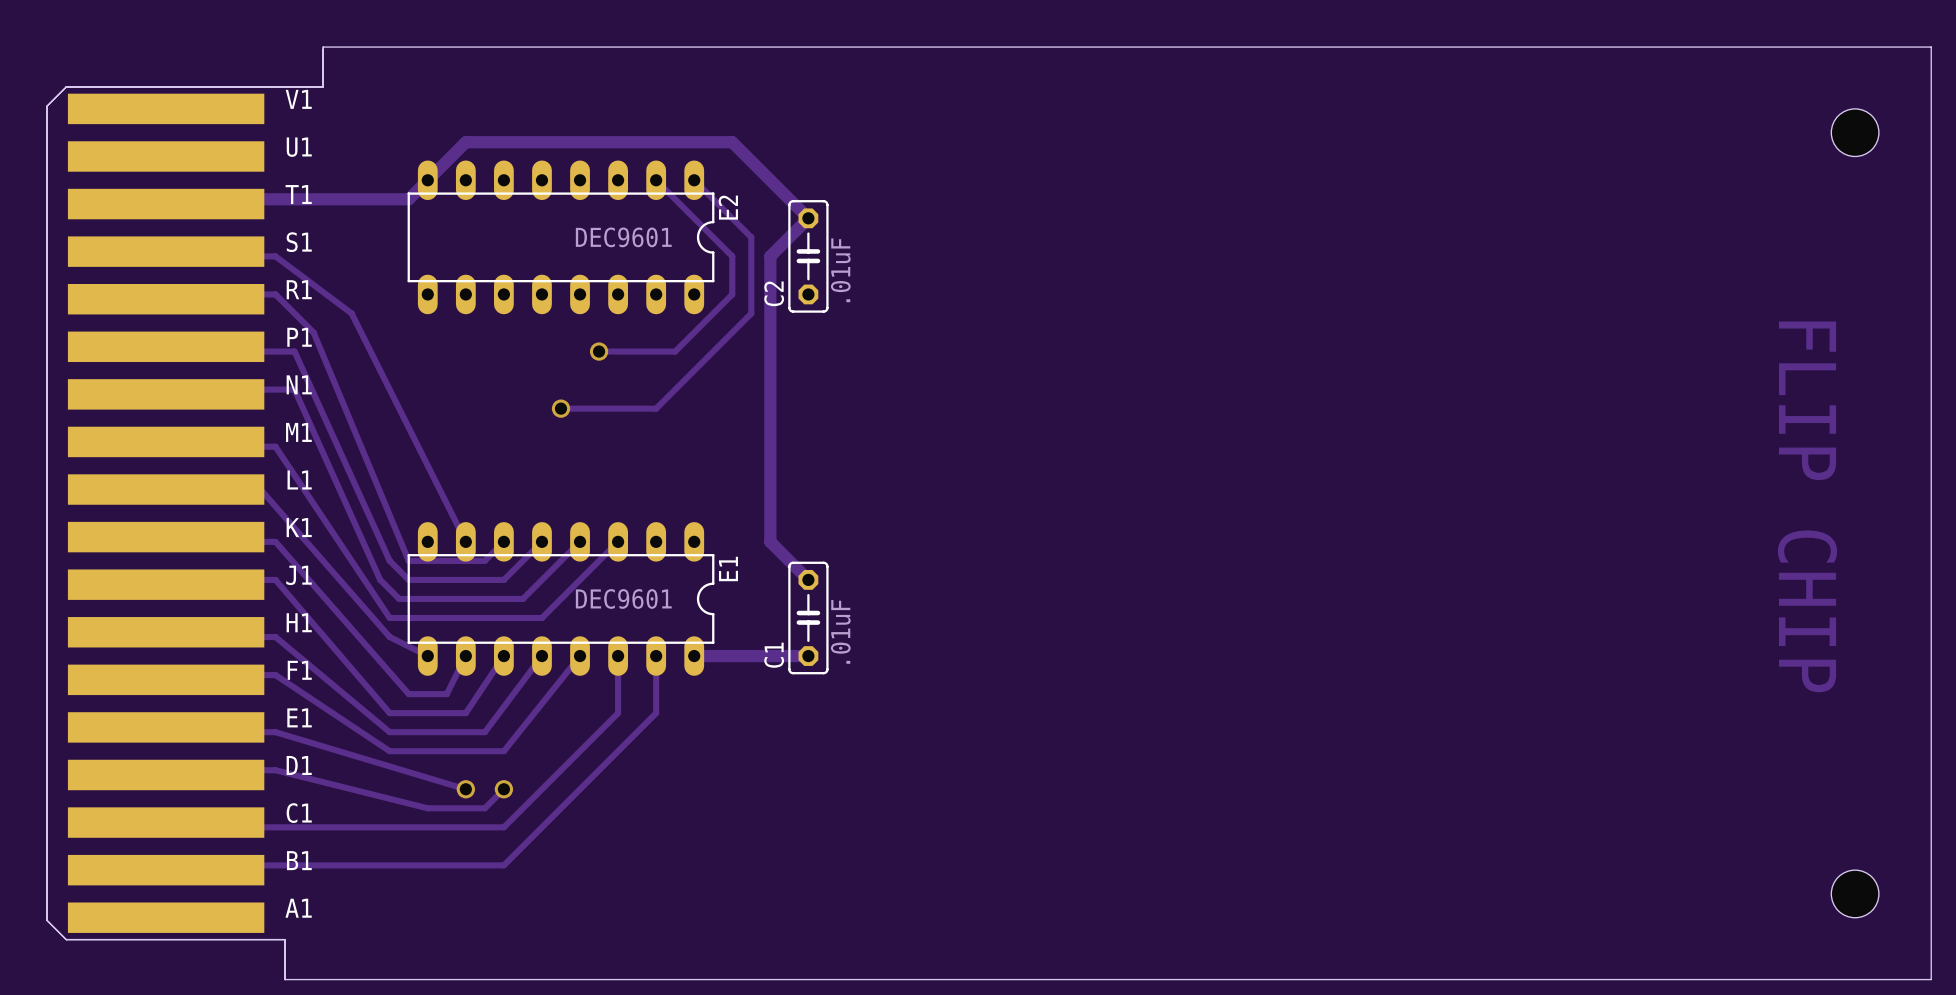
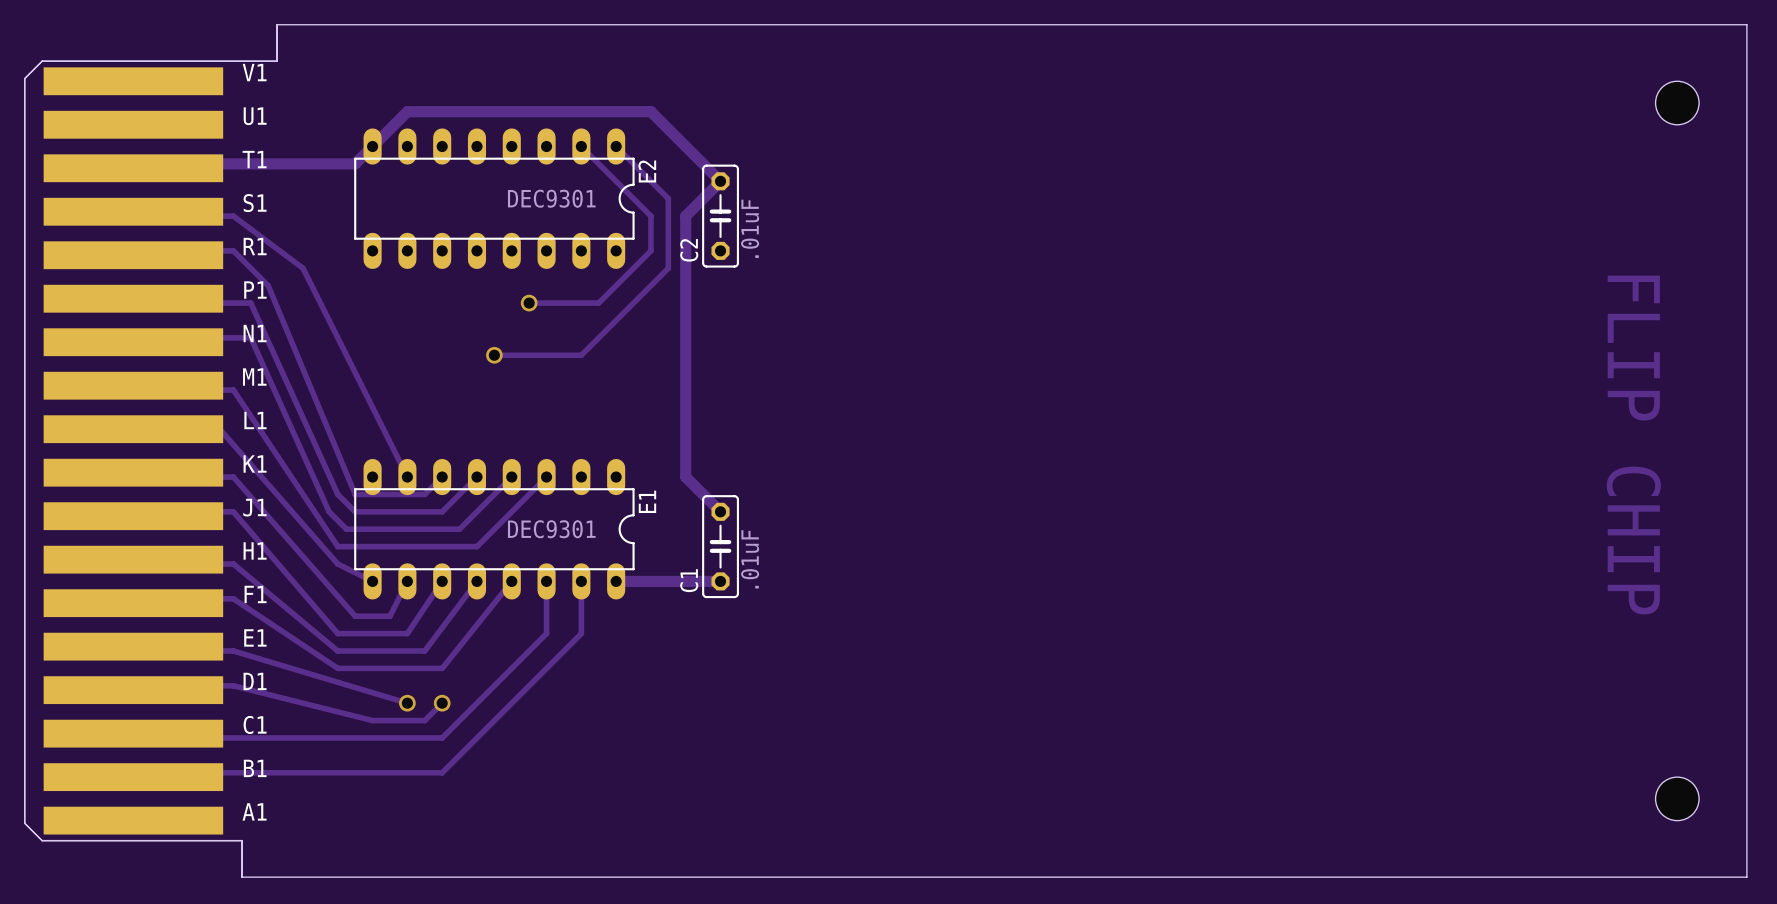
E2 value: DEC9601 (623, 237) -> DEC9301 (551, 198)
E1 value: DEC9601 (623, 598) -> DEC9301 (551, 529)

